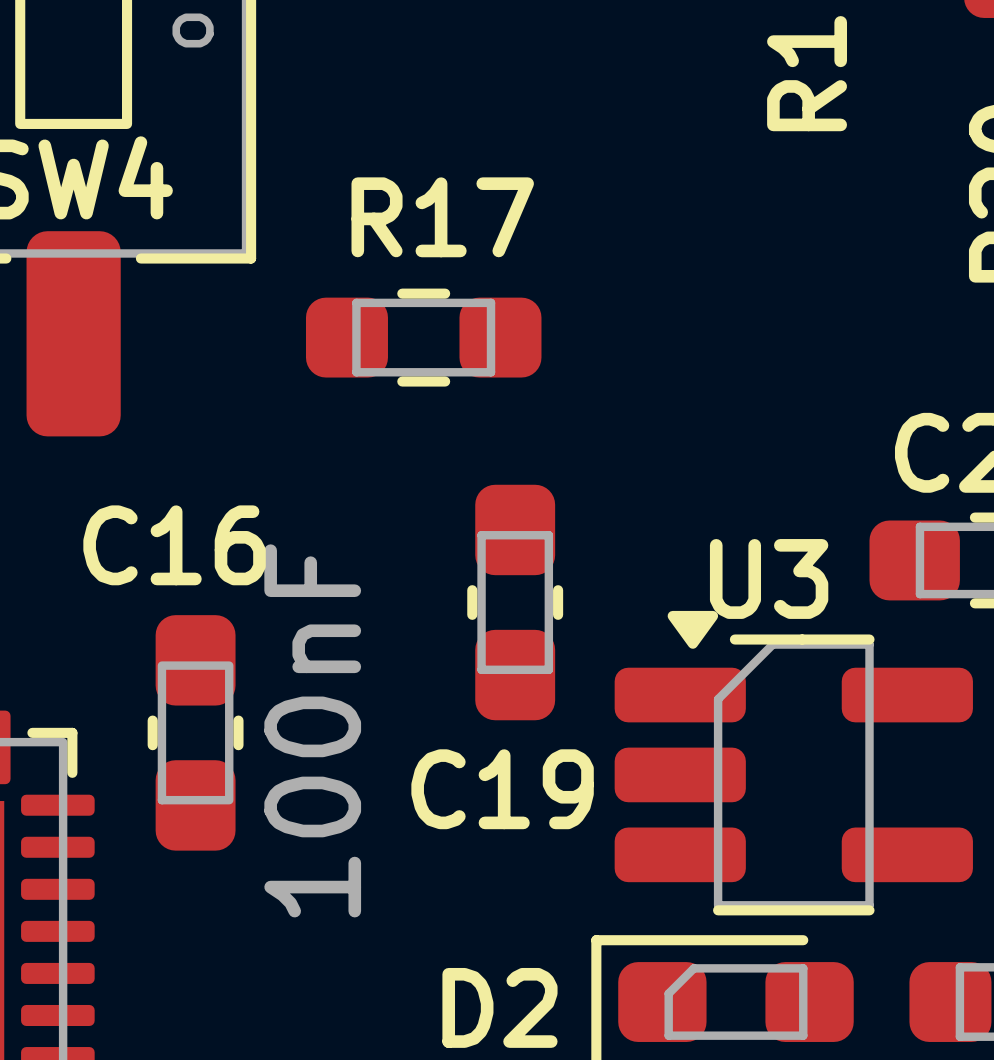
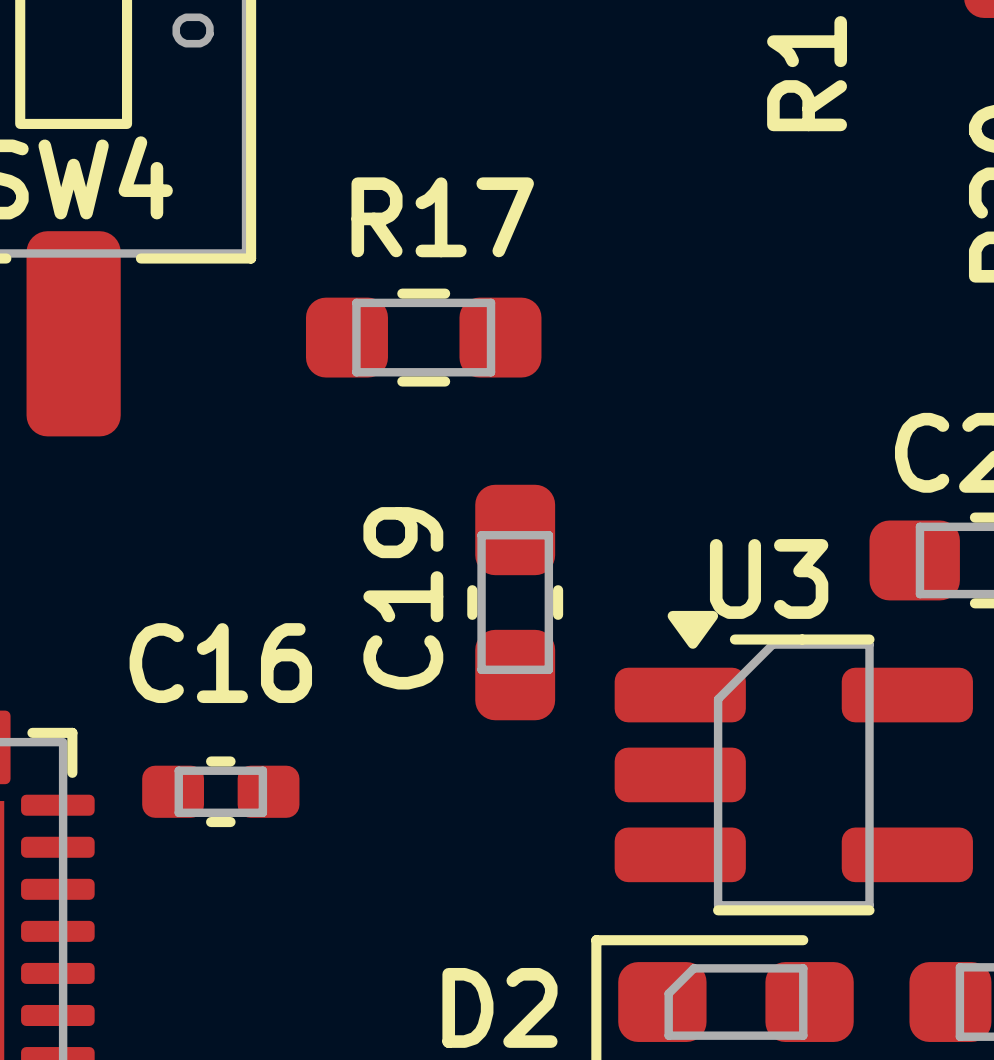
C16 footprint: [147, 615, 244, 851] -> [142, 756, 300, 828]
C16 value: 100nF (312, 730) -> none
C19 name rotation: 0° (502, 789) -> 90° counterclockwise (403, 598)

